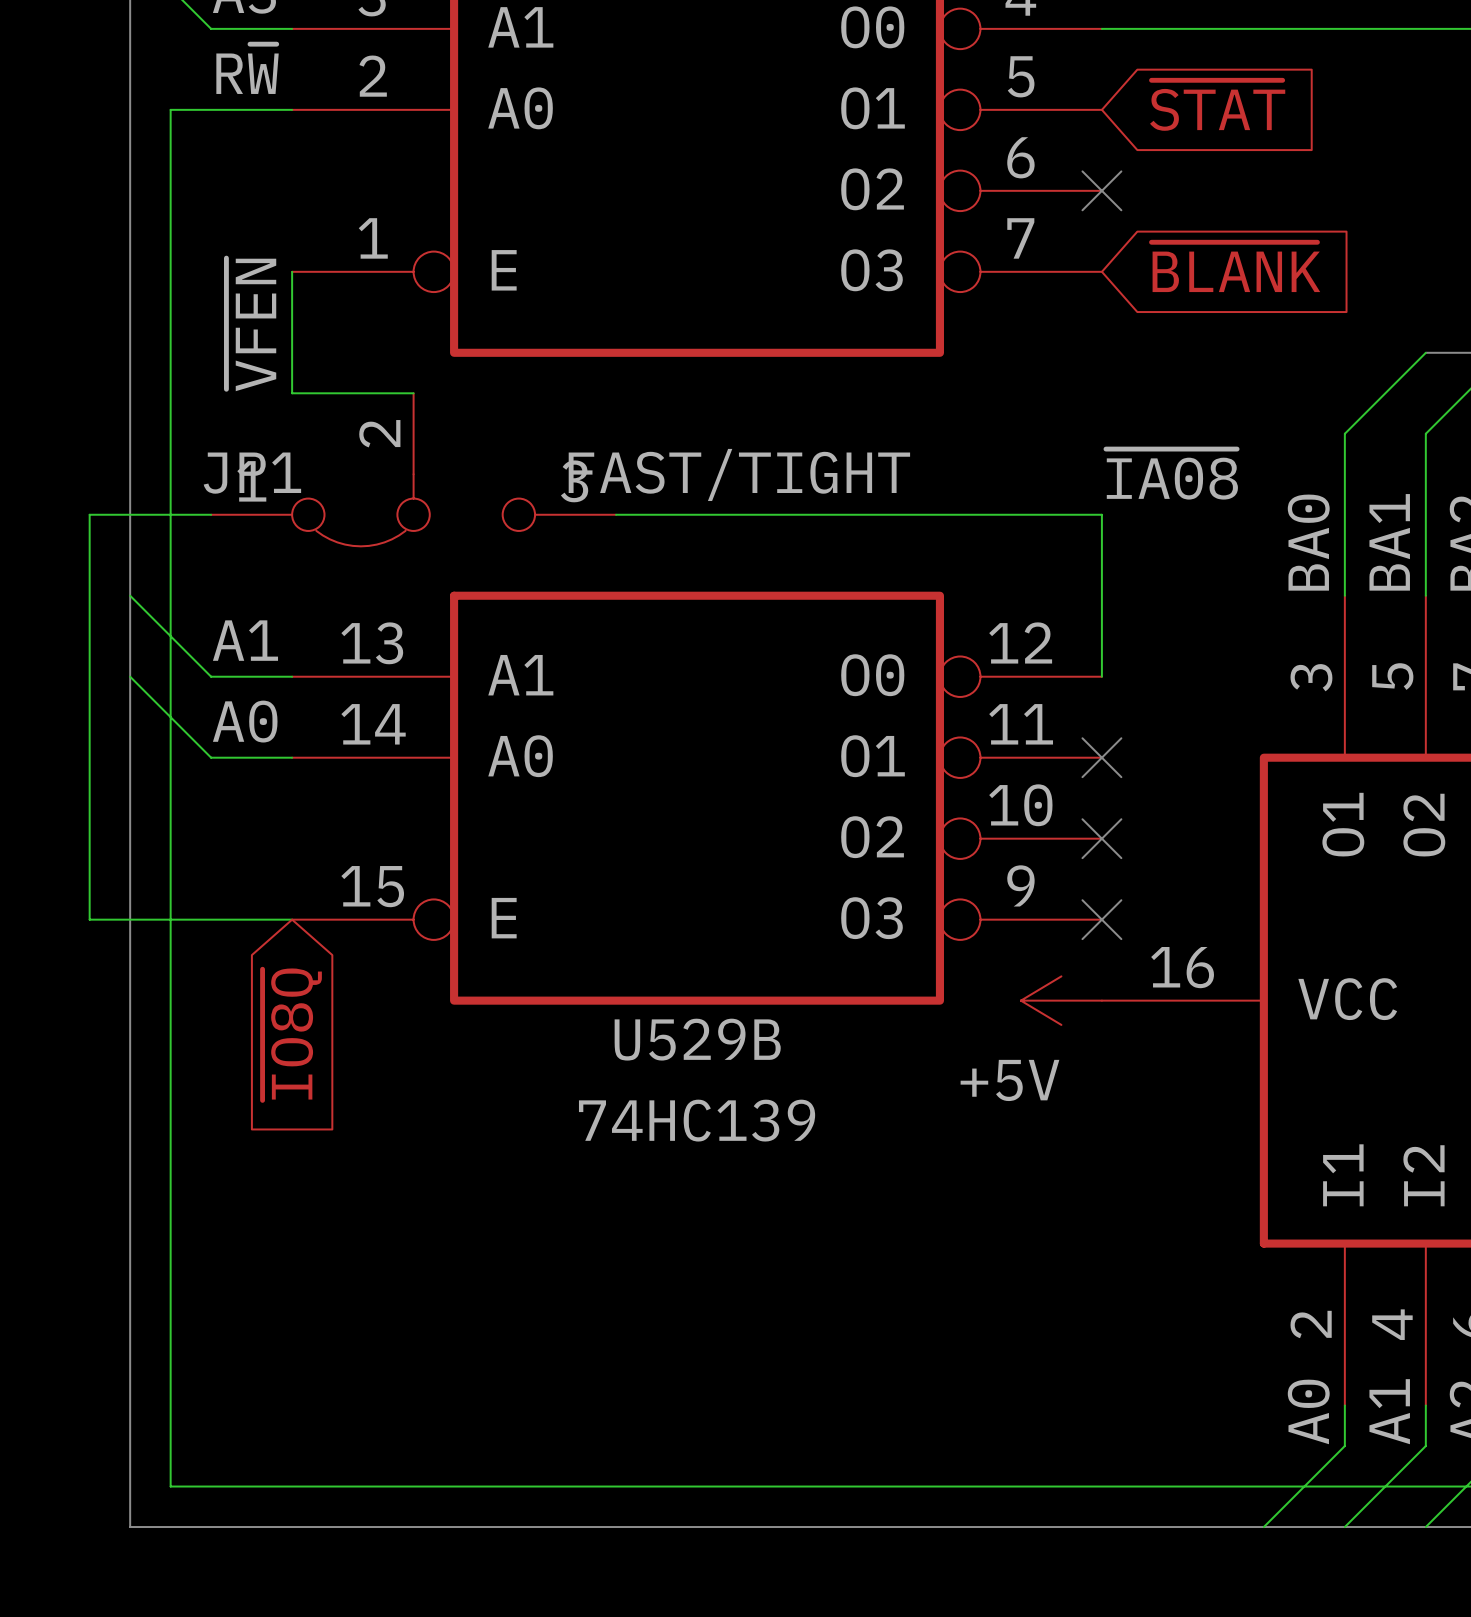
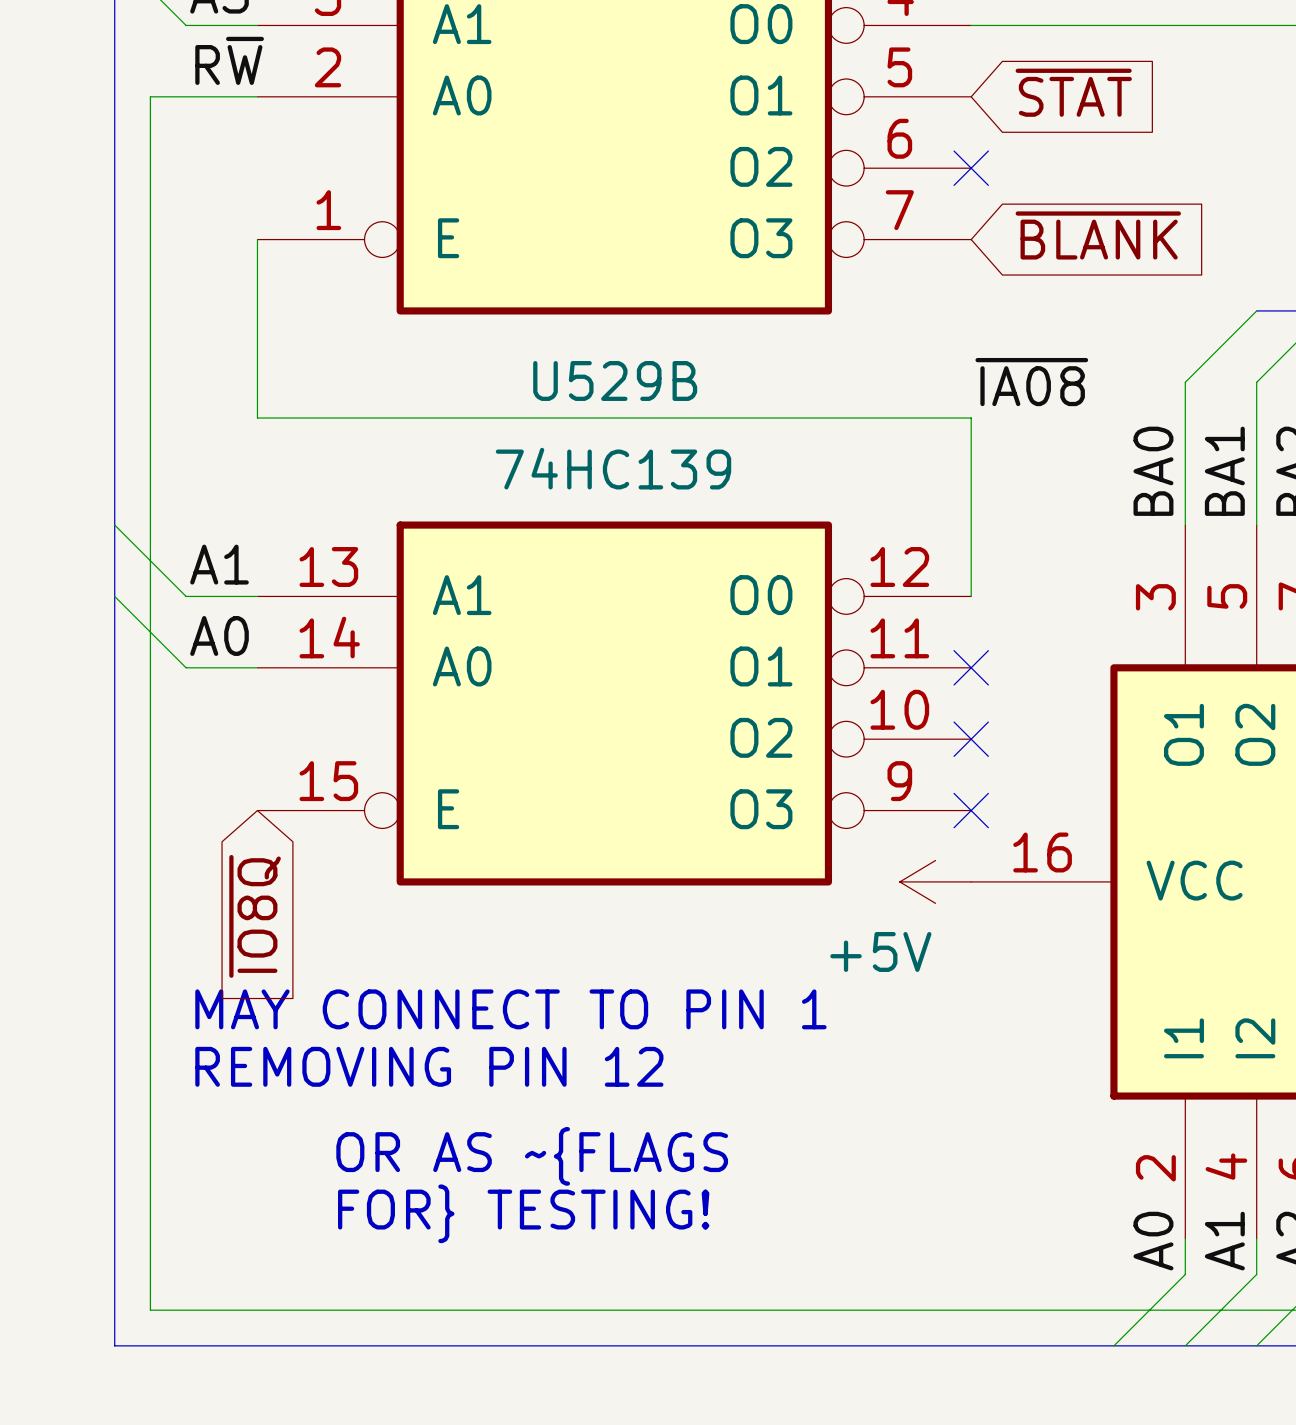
label: ~{VFEN} (251, 324) -> none
wire: (292, 393) (413, 393) -> none
JP1: FAST/TIGHT (413, 469) -> none
label position: ~{IA08} (1171, 474) -> ~{IA08} (1031, 382)
wire: (211, 514) (89, 514) (89, 919) (292, 919) -> none
wire: (616, 514) (1101, 514) -> (257, 346) (257, 418) (971, 418) (971, 453)
U529B name position: U529B (697, 1039) -> U529B (615, 380)
U529B value position: 74HC139 (697, 1120) -> 74HC139 (613, 468)
text: none -> MAY CONNECT TO PIN 1 (510, 1009)
text: none -> REMOVING PIN 12 (429, 1066)
text: none -> OR AS ~{FLAGS (532, 1156)
text: none -> FOR} TESTING! (523, 1213)

